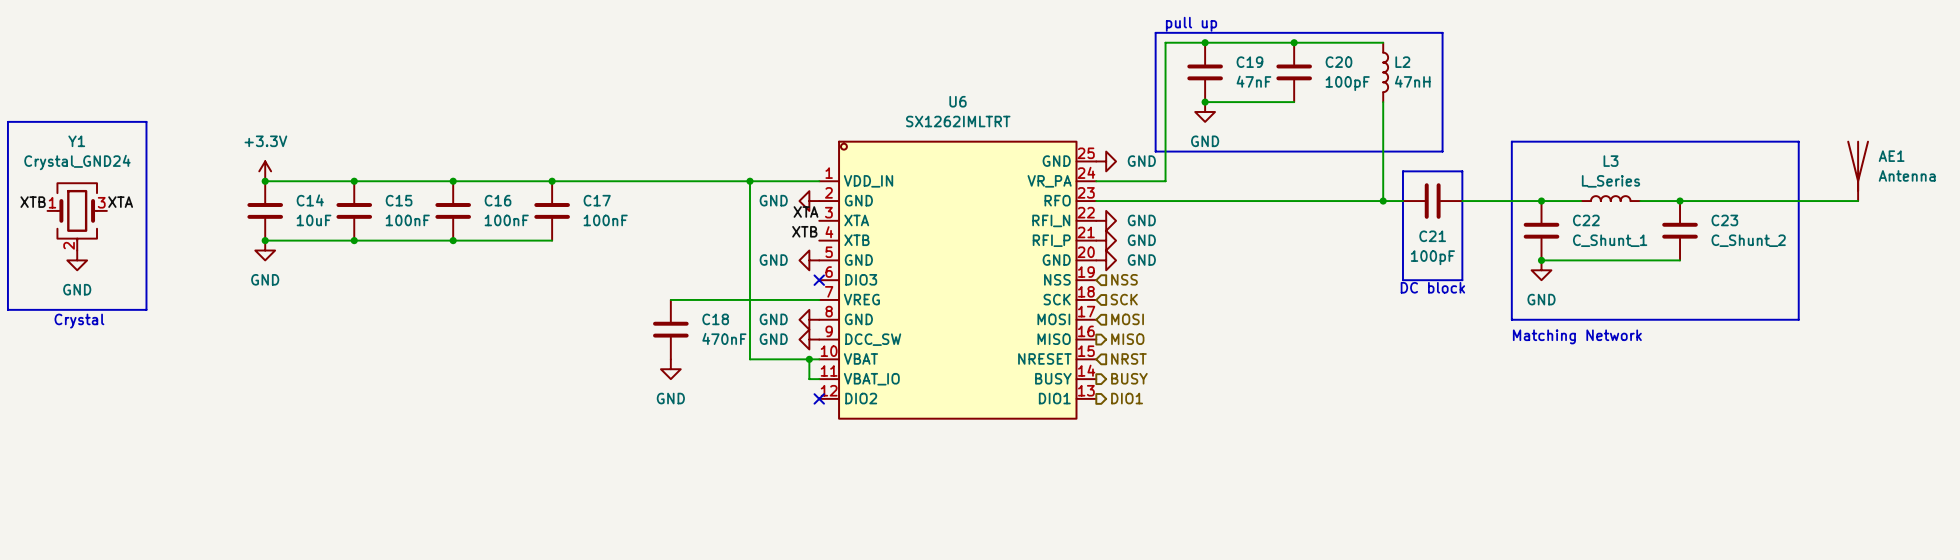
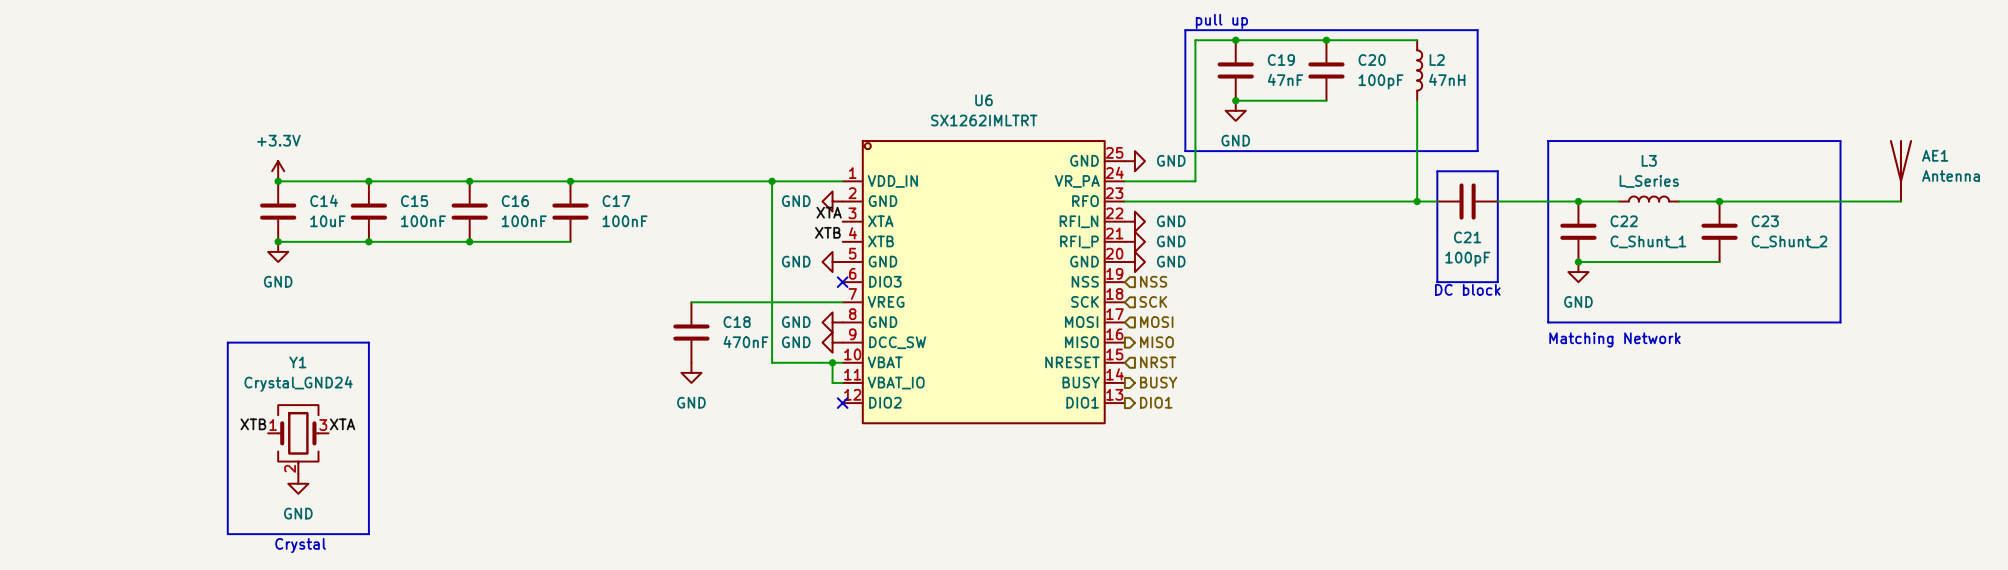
line: (7, 121) (146, 121) (146, 309) (7, 309) (7, 121) -> none
label: XTB (33, 202) -> none
label: XTA (120, 202) -> none
Y1 position: (77, 216) -> (298, 439)
power symbol: GND (77, 260) -> none
text: Crystal (79, 321) -> none
line: none -> (227, 342) (368, 342) (368, 534) (227, 534) (227, 342)
label: none -> XTB (253, 424)
label: none -> XTA (342, 424)
power symbol: none -> GND (298, 483)
text: none -> Crystal (300, 545)

